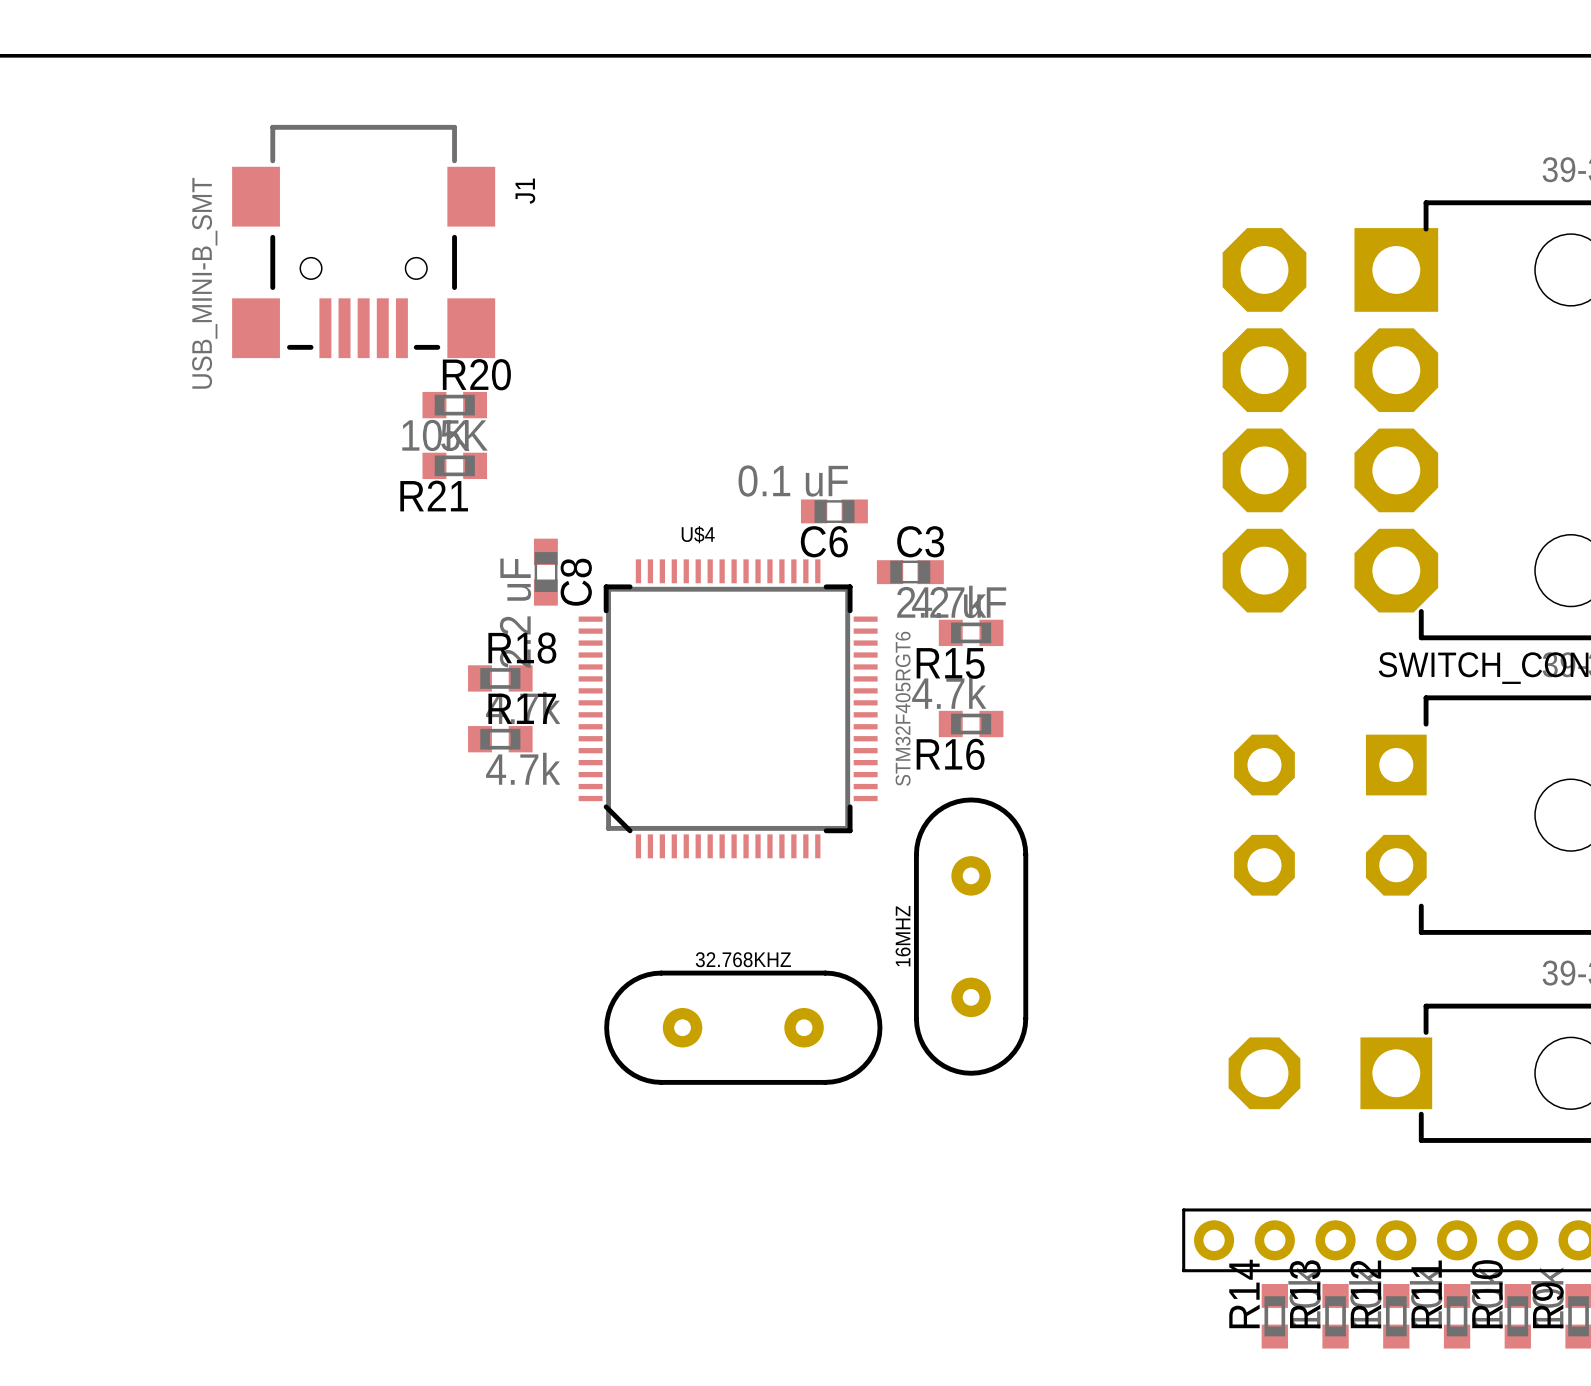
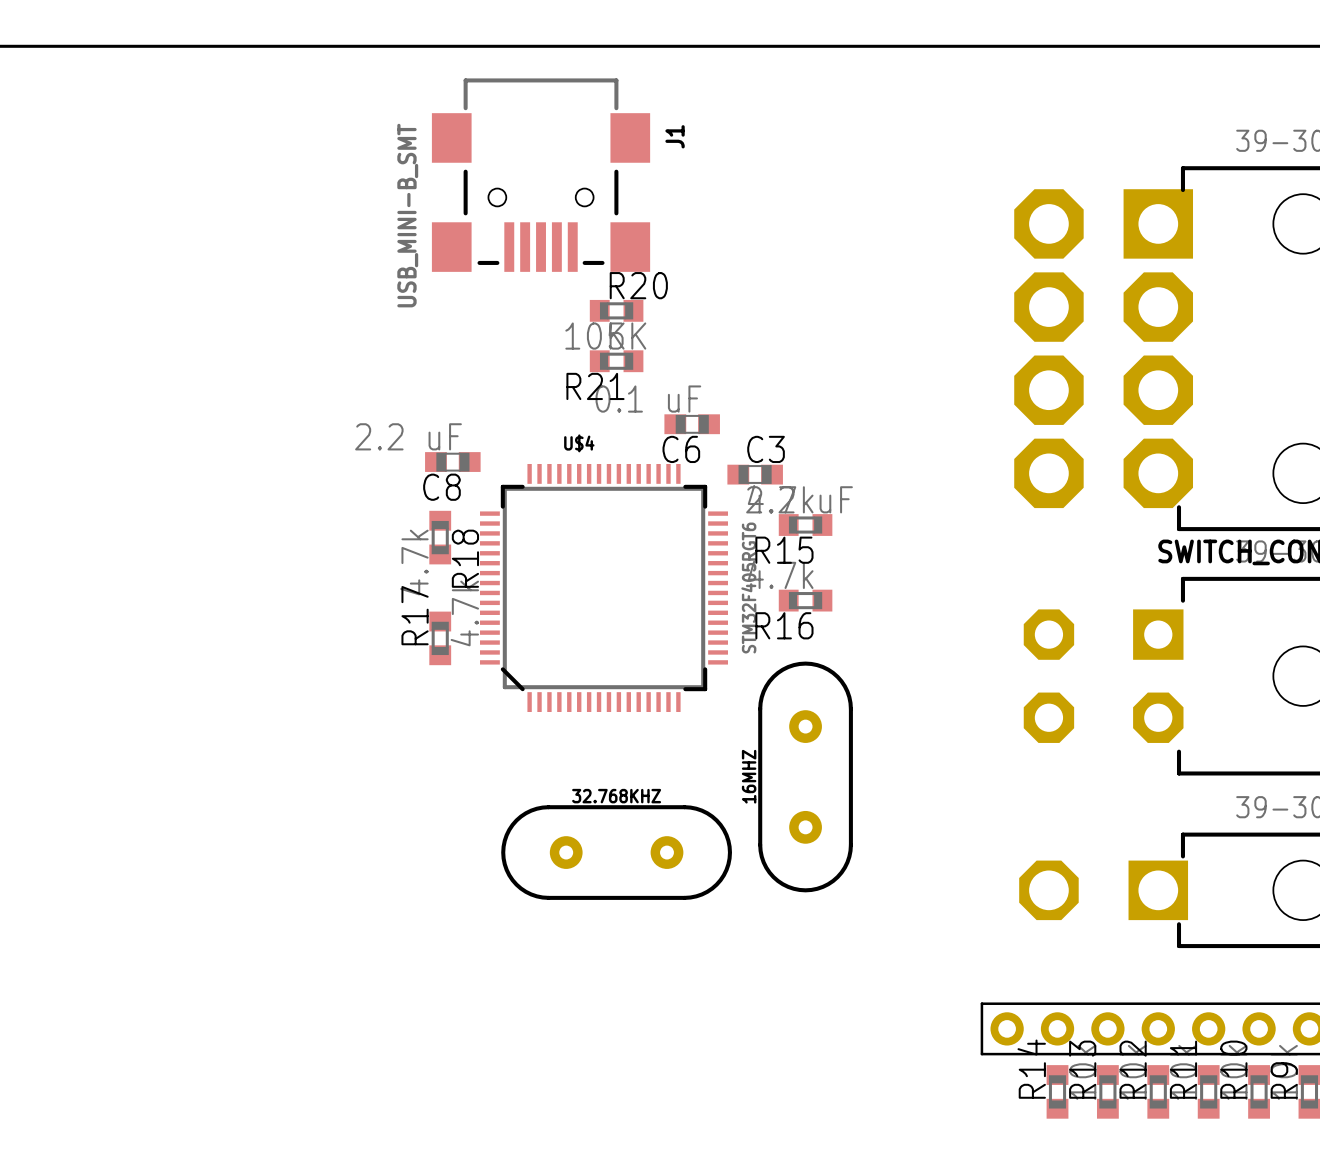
J1 position: (363, 241) -> (541, 175)
R20 position: (454, 405) -> (616, 310)
R21 position: (454, 465) -> (616, 361)
C8 rotation: 0° (545, 572) -> 90° clockwise (452, 462)
R18 rotation: 0° (500, 678) -> 90° clockwise (440, 537)
R18 position: (500, 678) -> (440, 537)
R17 name position: R17 (522, 708) -> R17 (415, 615)
R17 rotation: 0° (500, 739) -> 90° clockwise (440, 638)
R17 position: (500, 739) -> (440, 638)
R17 value position: 4.7k (523, 768) -> 4.7k (464, 613)

